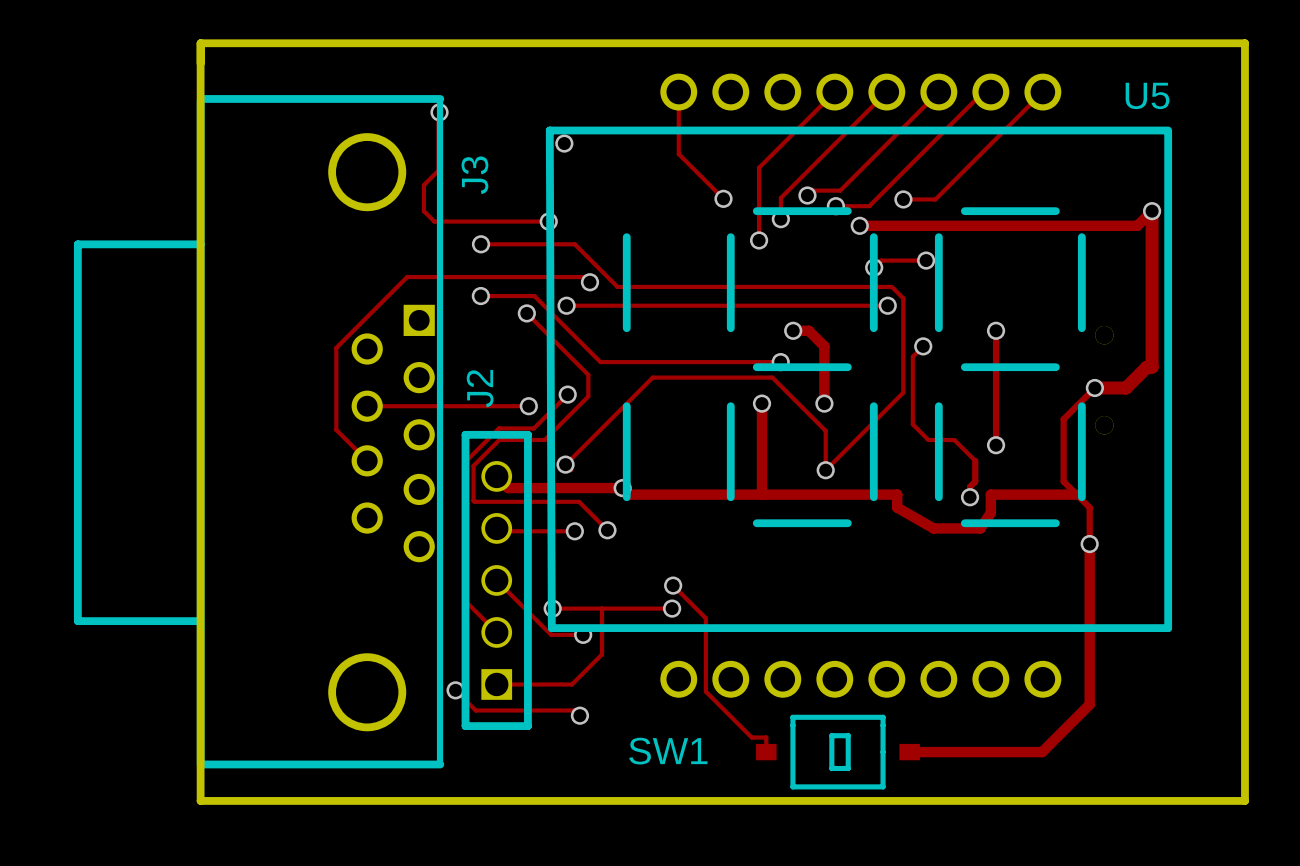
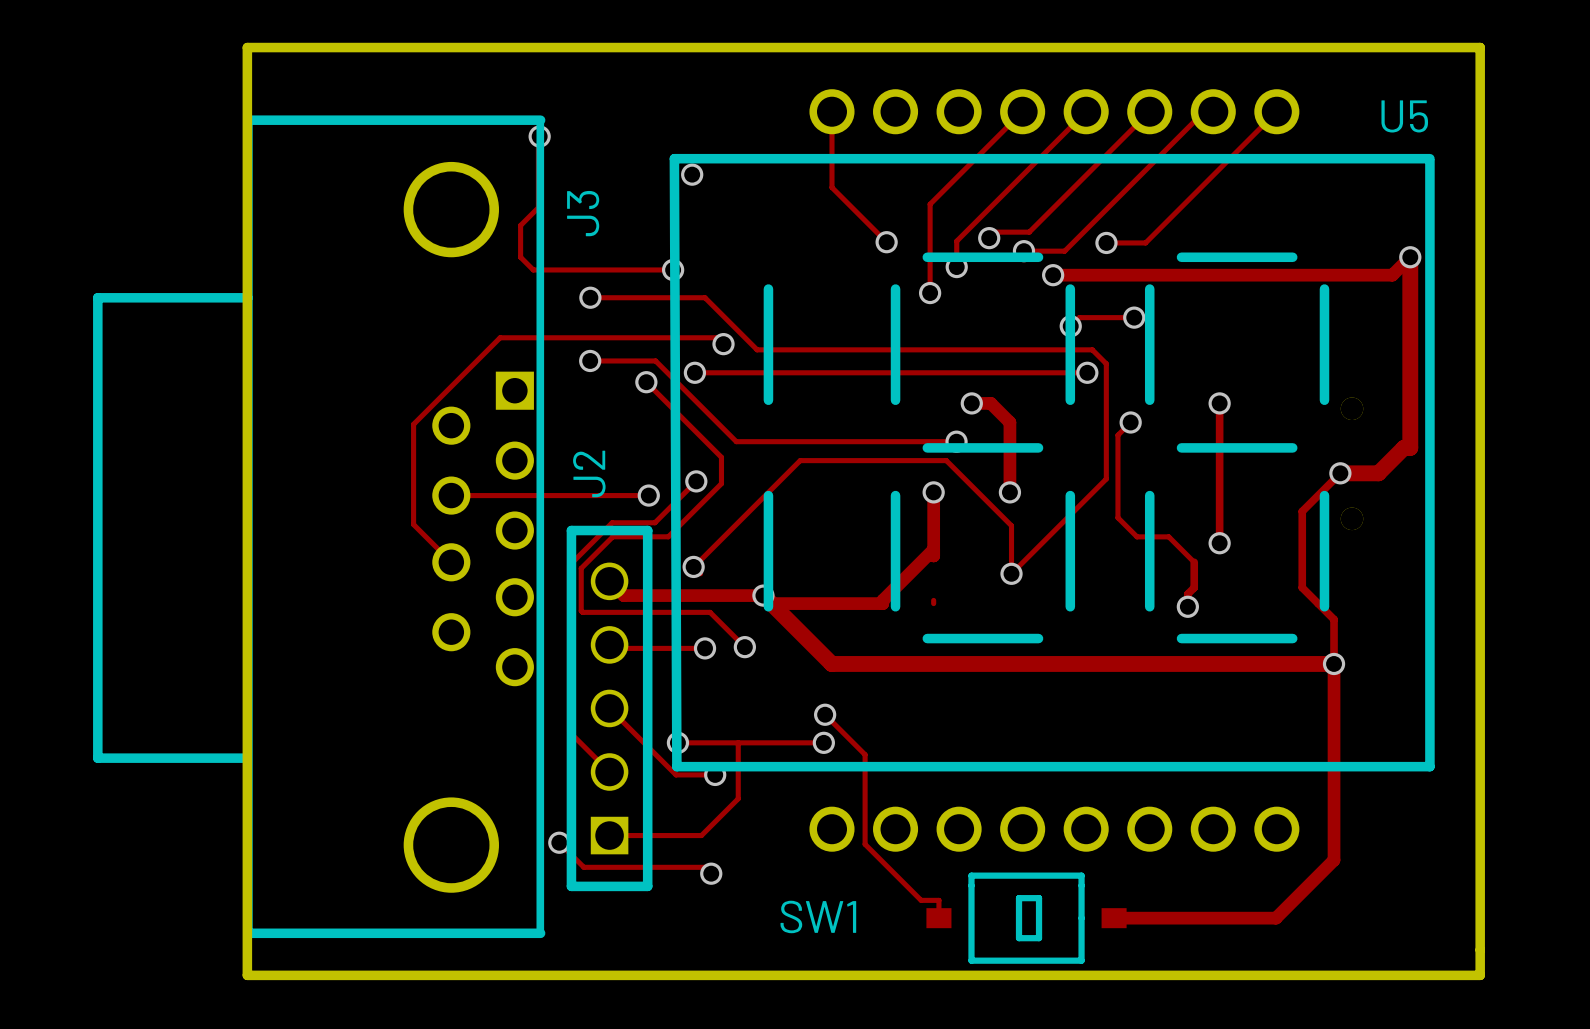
board edge: (200, 43) (200, 800) (1244, 800) (1244, 43) (200, 43) -> (247, 47) (247, 975) (1480, 975) (1480, 47) (247, 47)
track: (761, 455) (761, 494) -> none
track: none -> (763, 595) (831, 663) (1334, 663)
track: (720, 494) (897, 494) (897, 507) (933, 528) (980, 528) (990, 512) (990, 494) (1076, 494) -> (882, 603) (882, 600) (933, 549)

